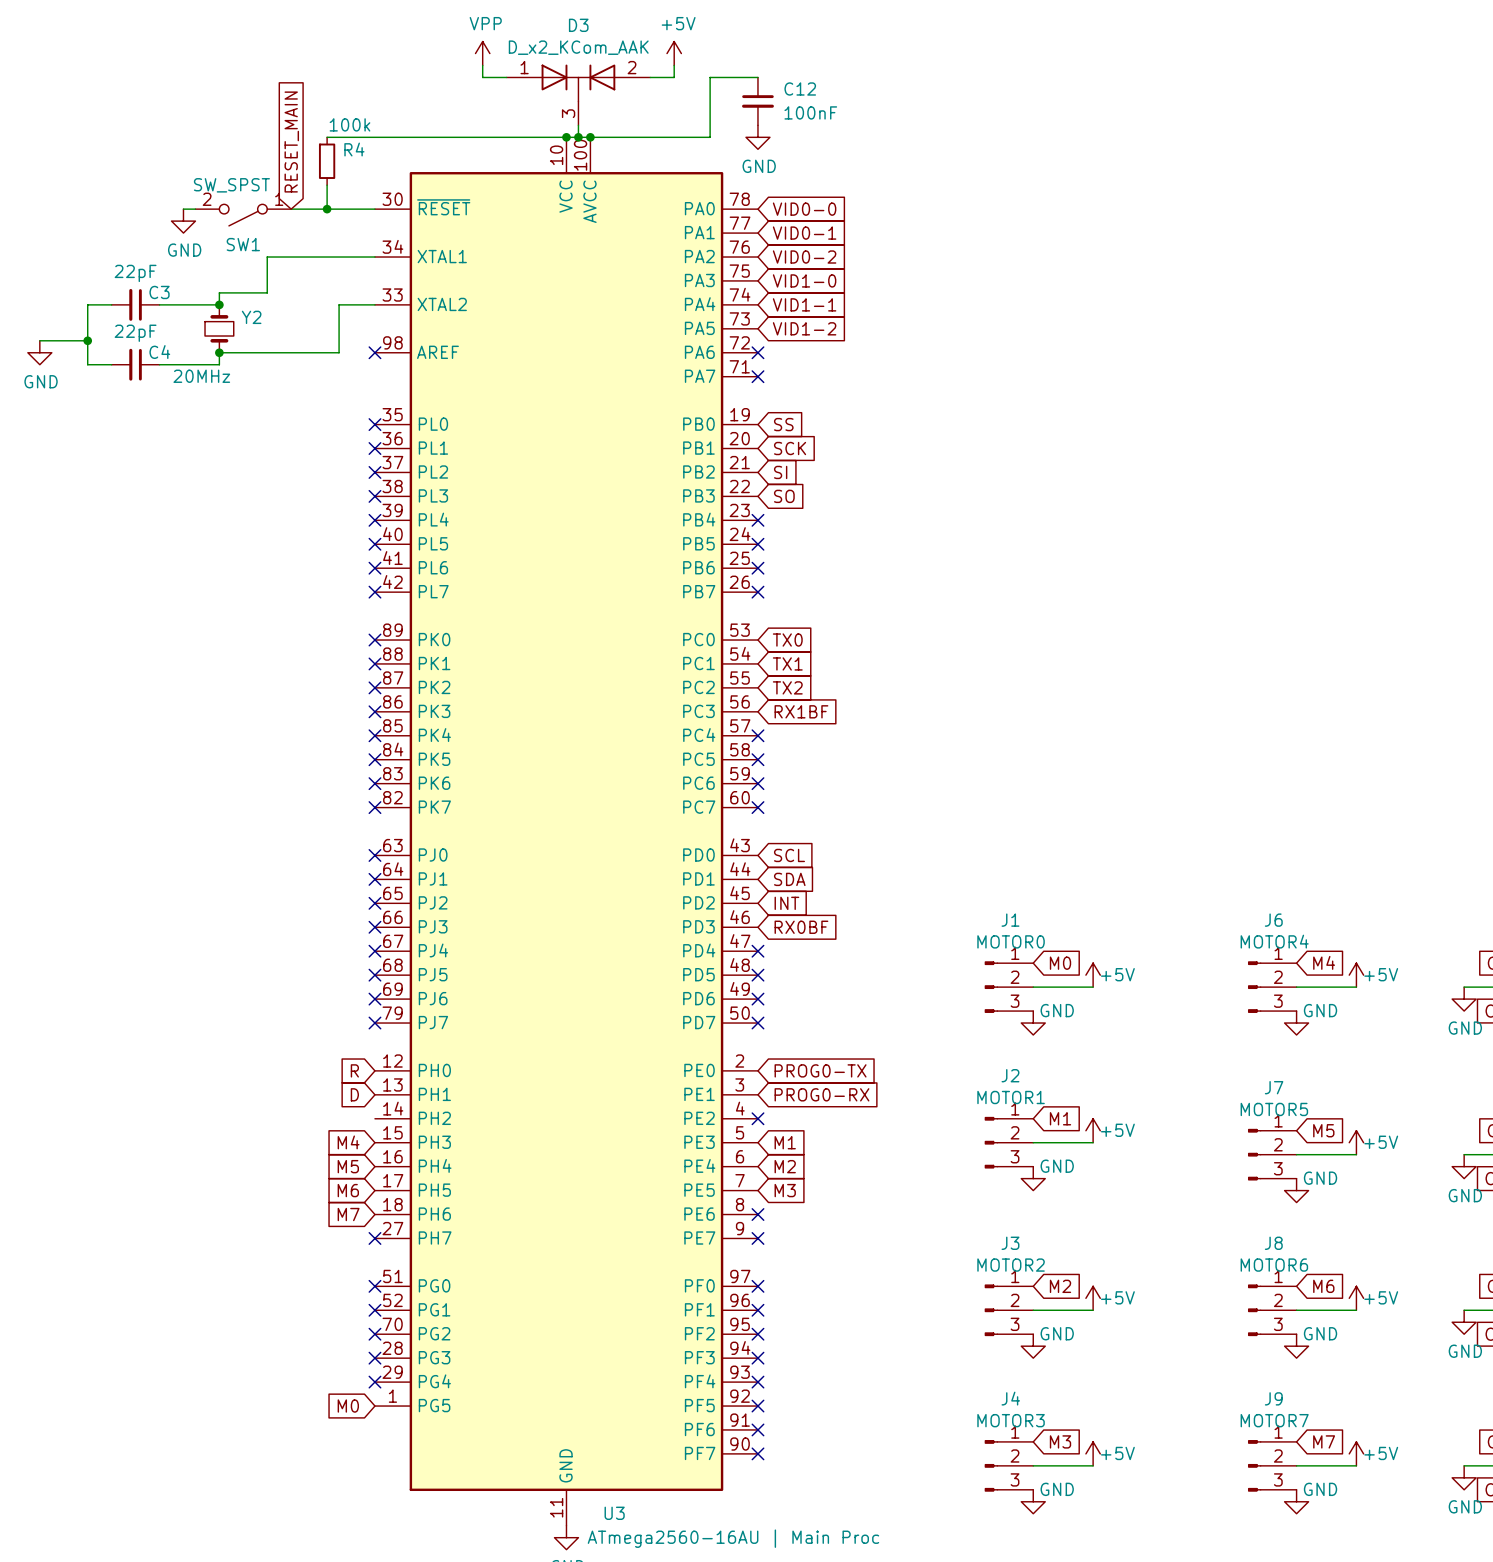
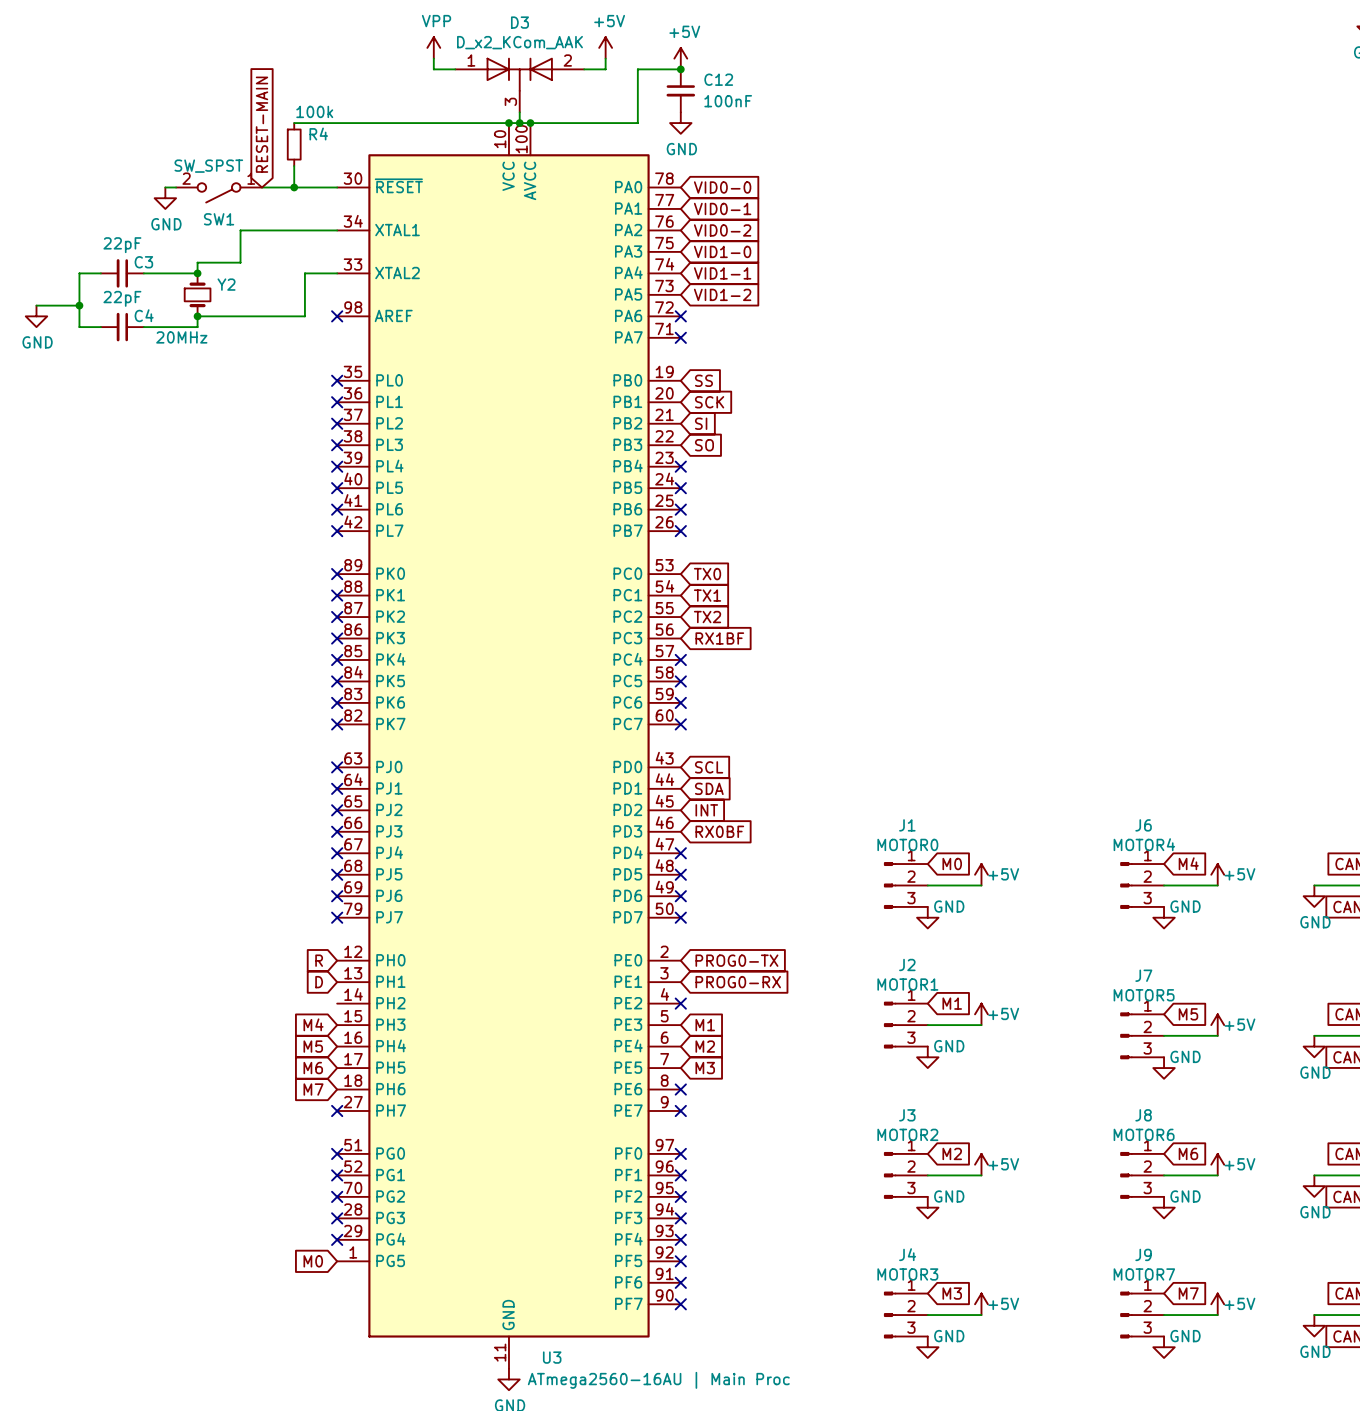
power symbol: none -> +5V (680, 58)
junction: none -> (680, 69)
global label: RESET_MAIN (291, 142) -> RESET-MAIN (262, 124)

